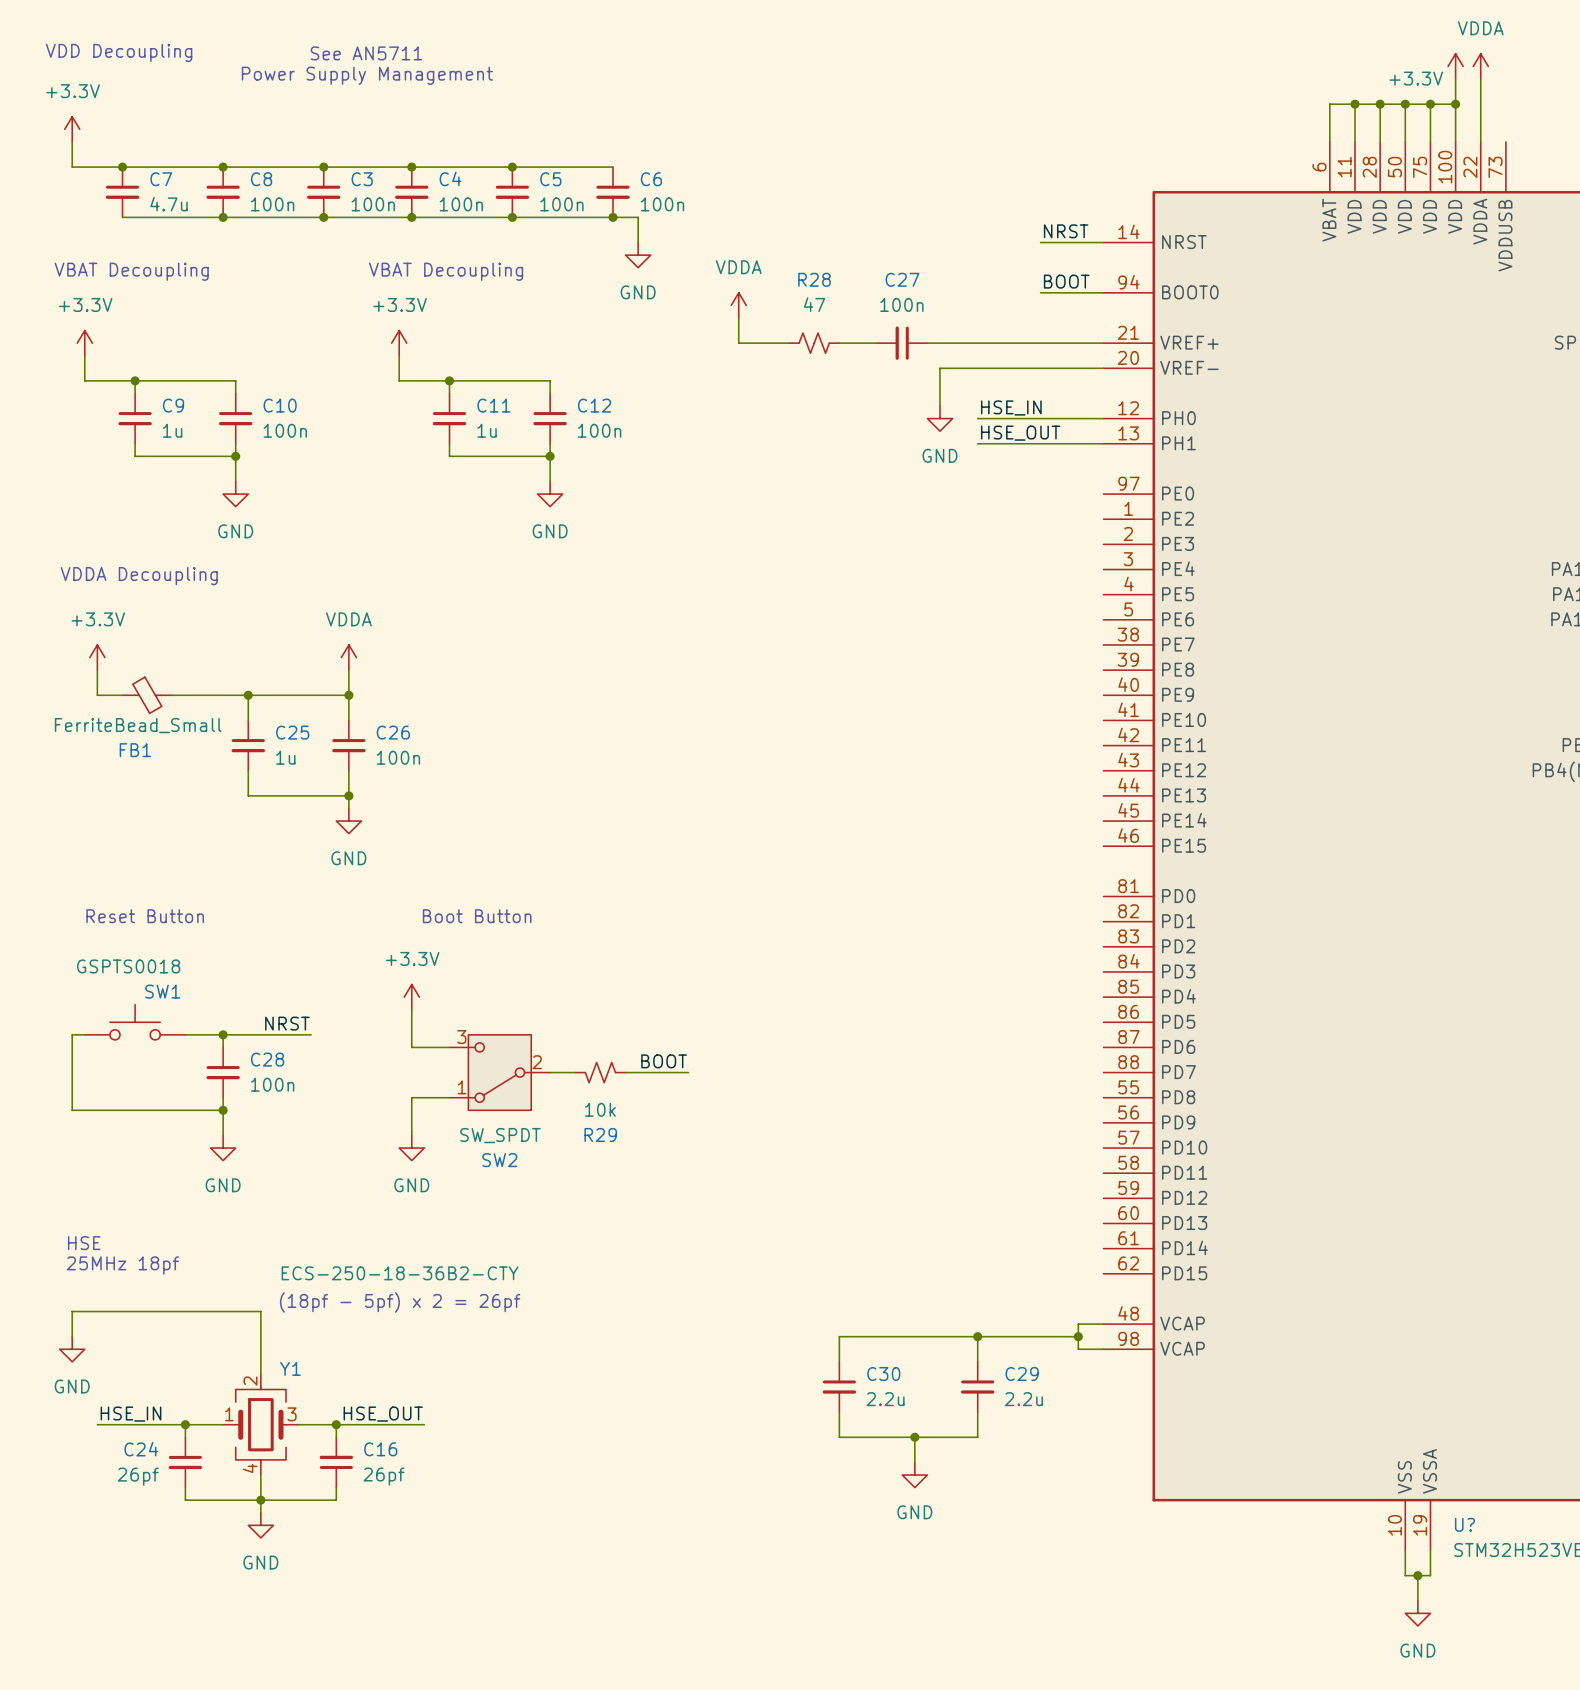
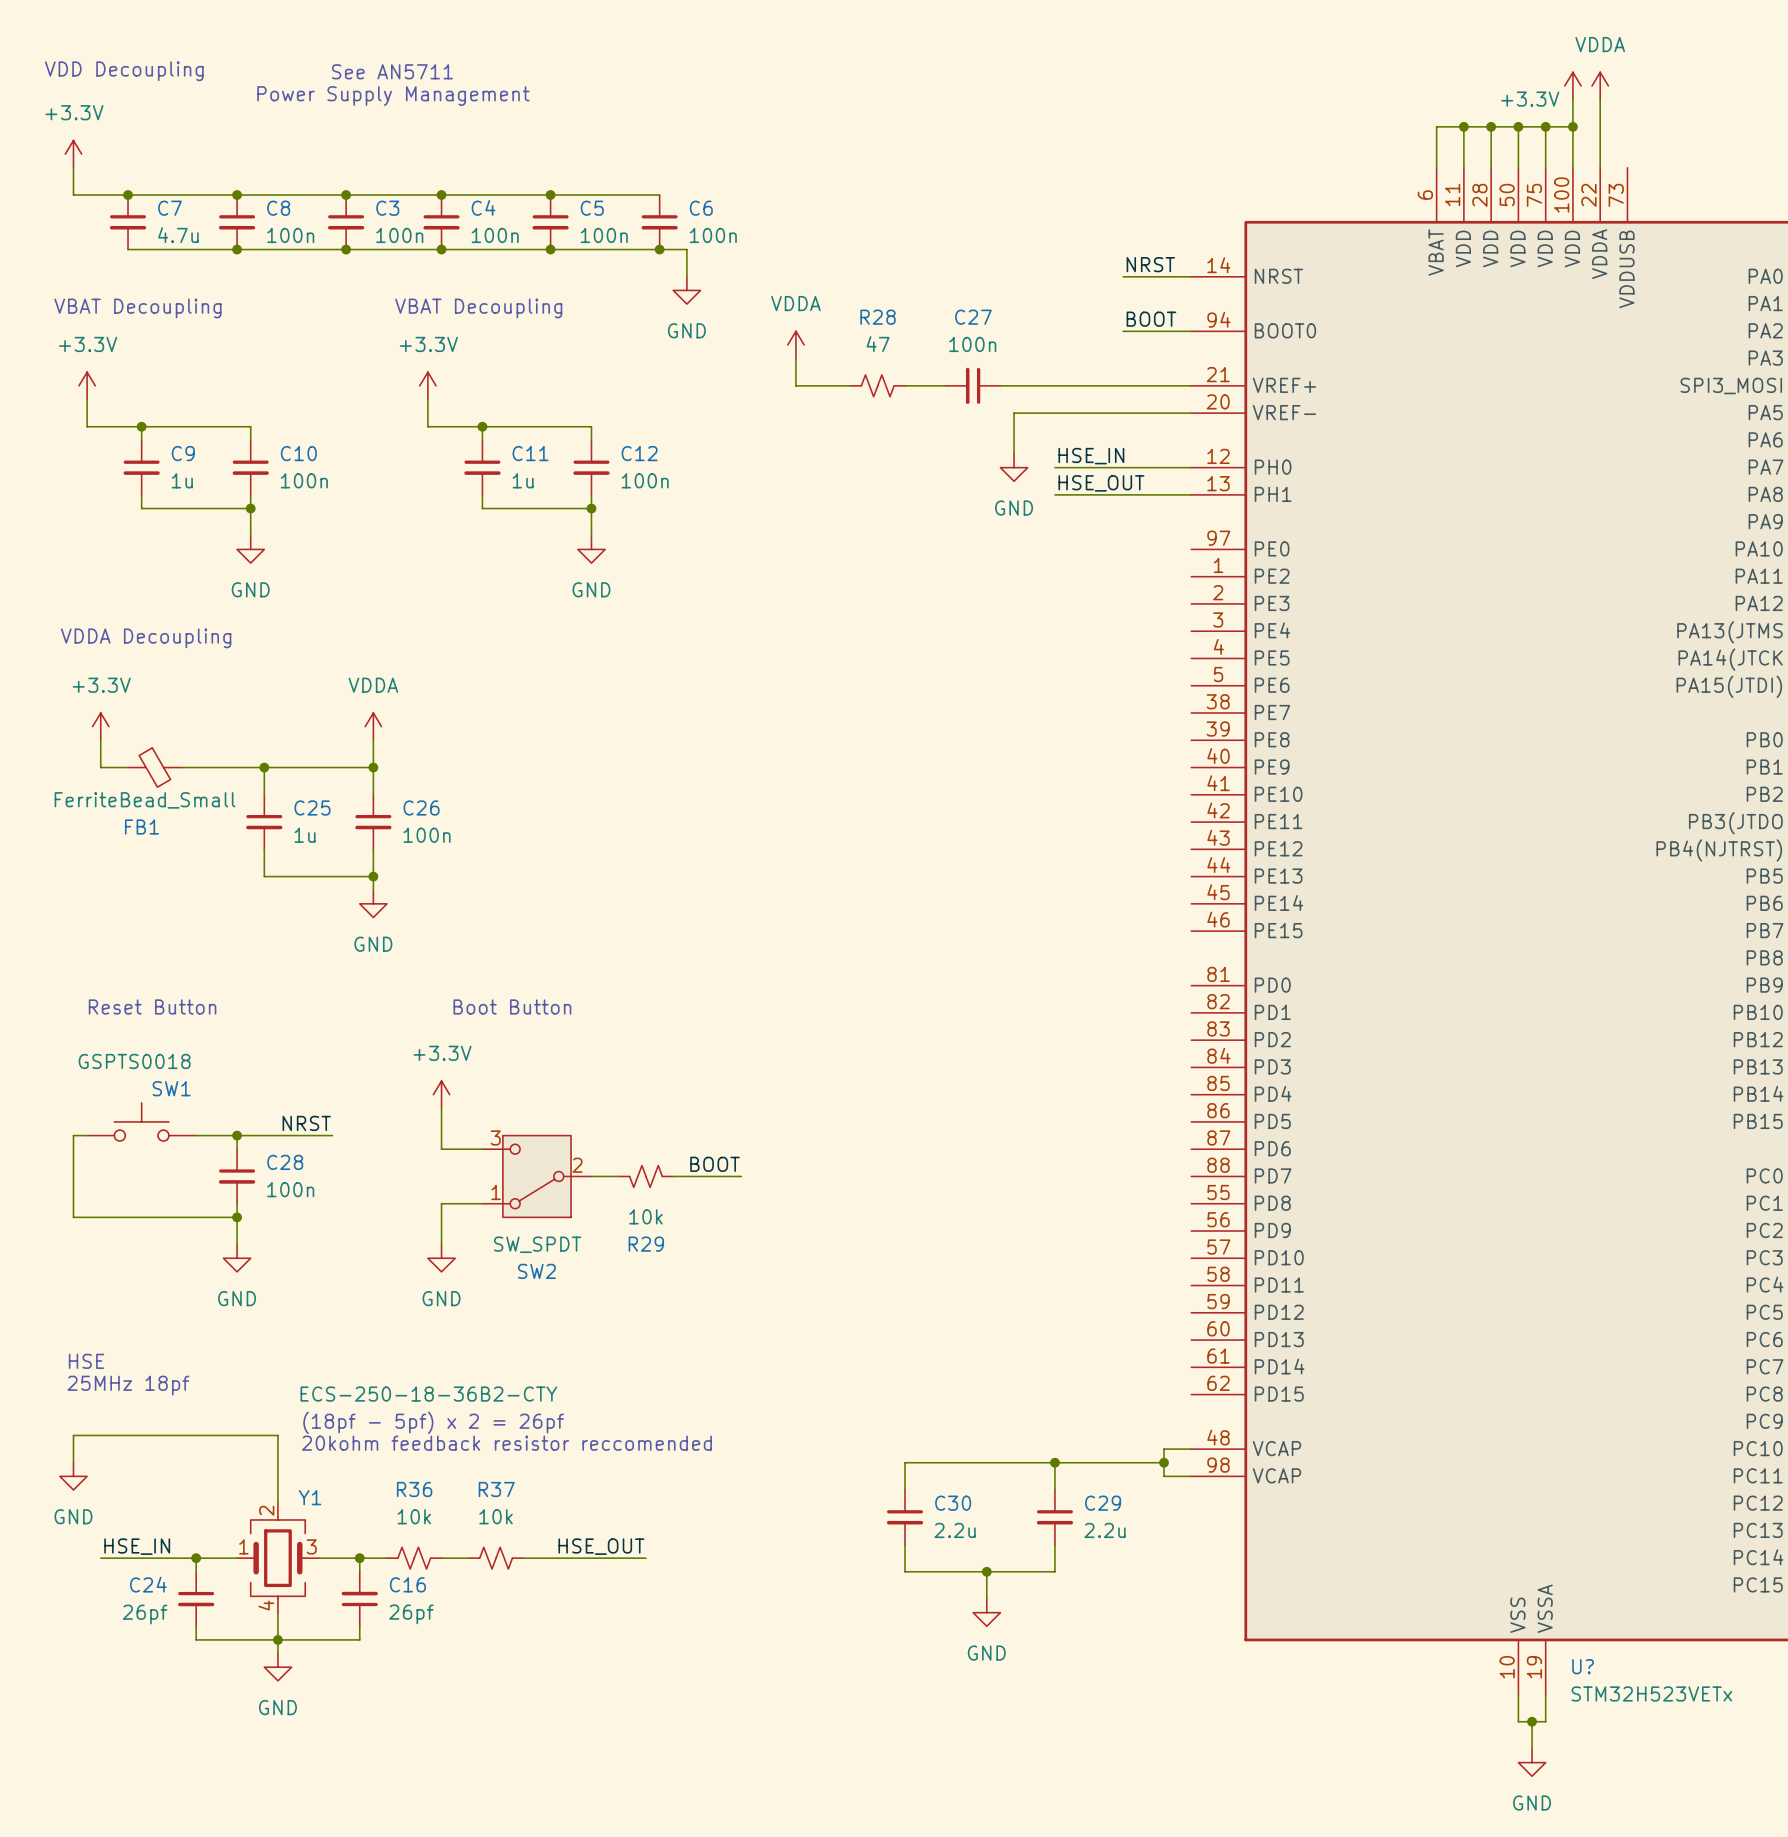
text position: (18pf - 5pf) x 2 = 26pf (400, 1302) -> (18pf - 5pf) x 2 = 26pf (433, 1422)
text: none -> 20kohm feedback resistor reccomended (506, 1443)
label position: HSE_OUT (383, 1414) -> HSE_OUT (601, 1546)
R36: none -> 10k (414, 1558)
wire: none -> (455, 1558) (468, 1558)
R37: none -> 10k (496, 1558)
wire: none -> (523, 1558) (646, 1558)

